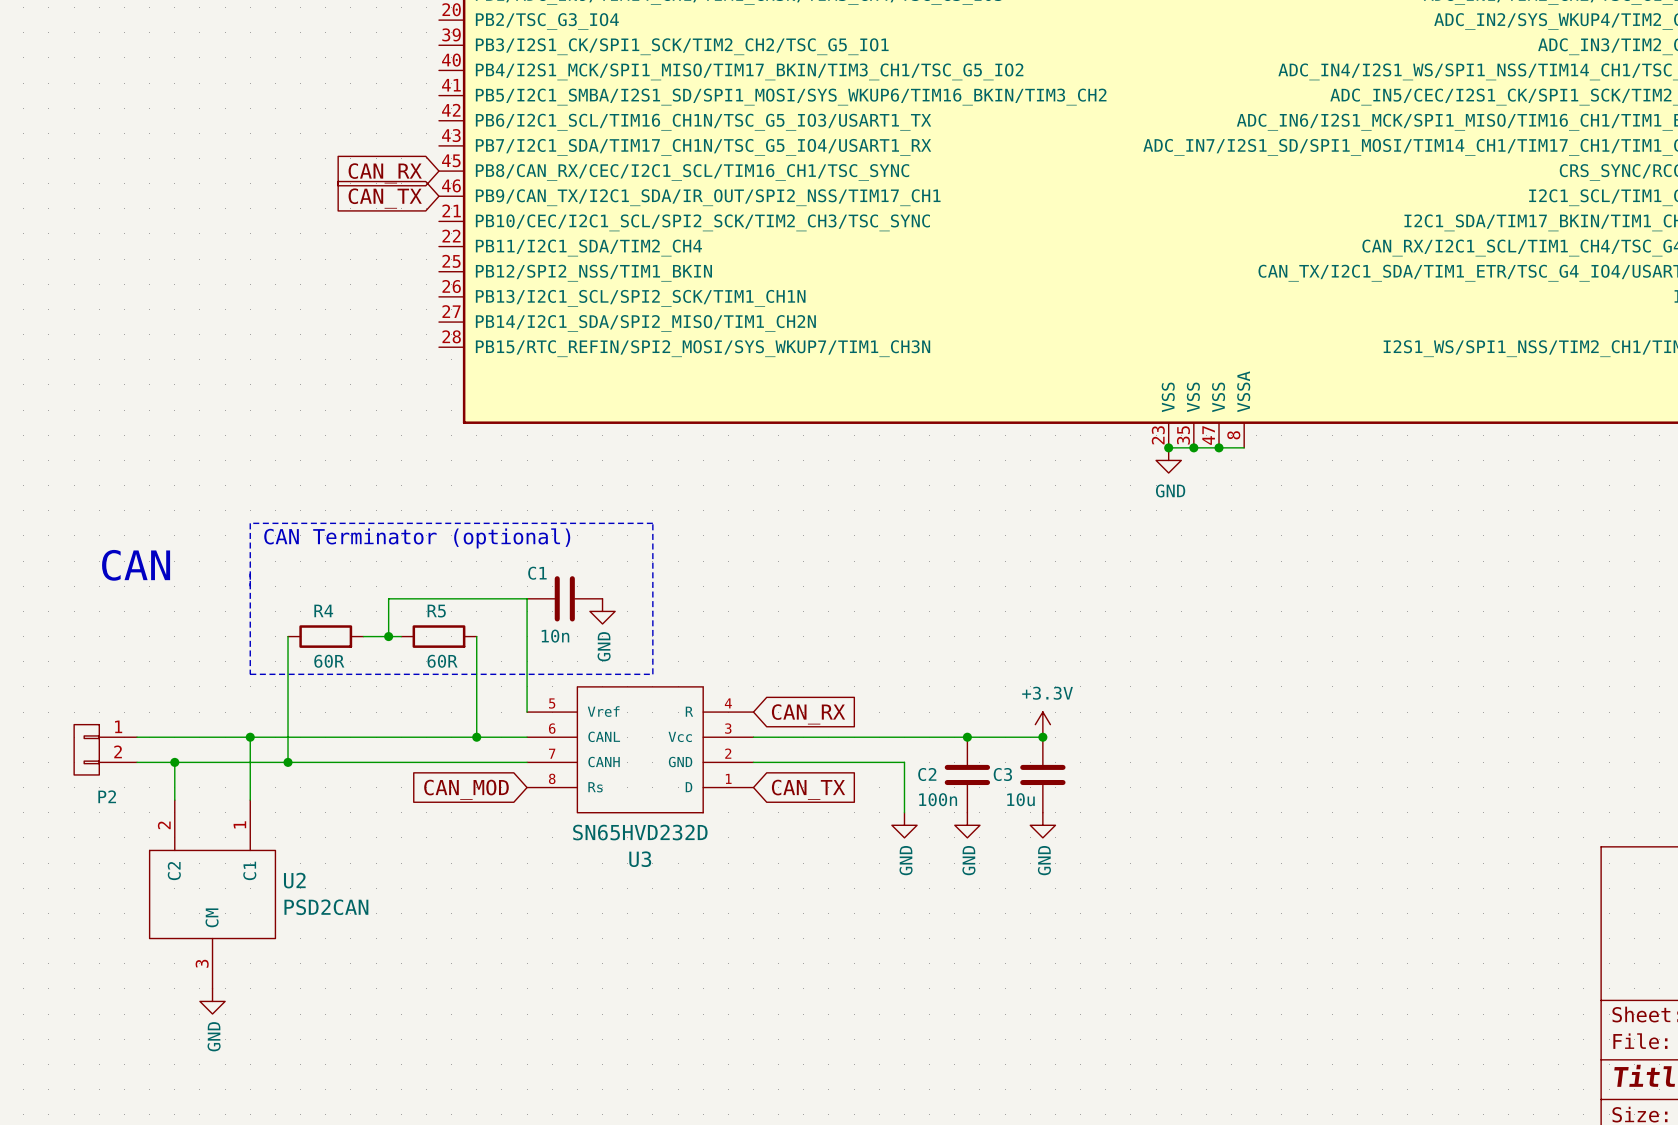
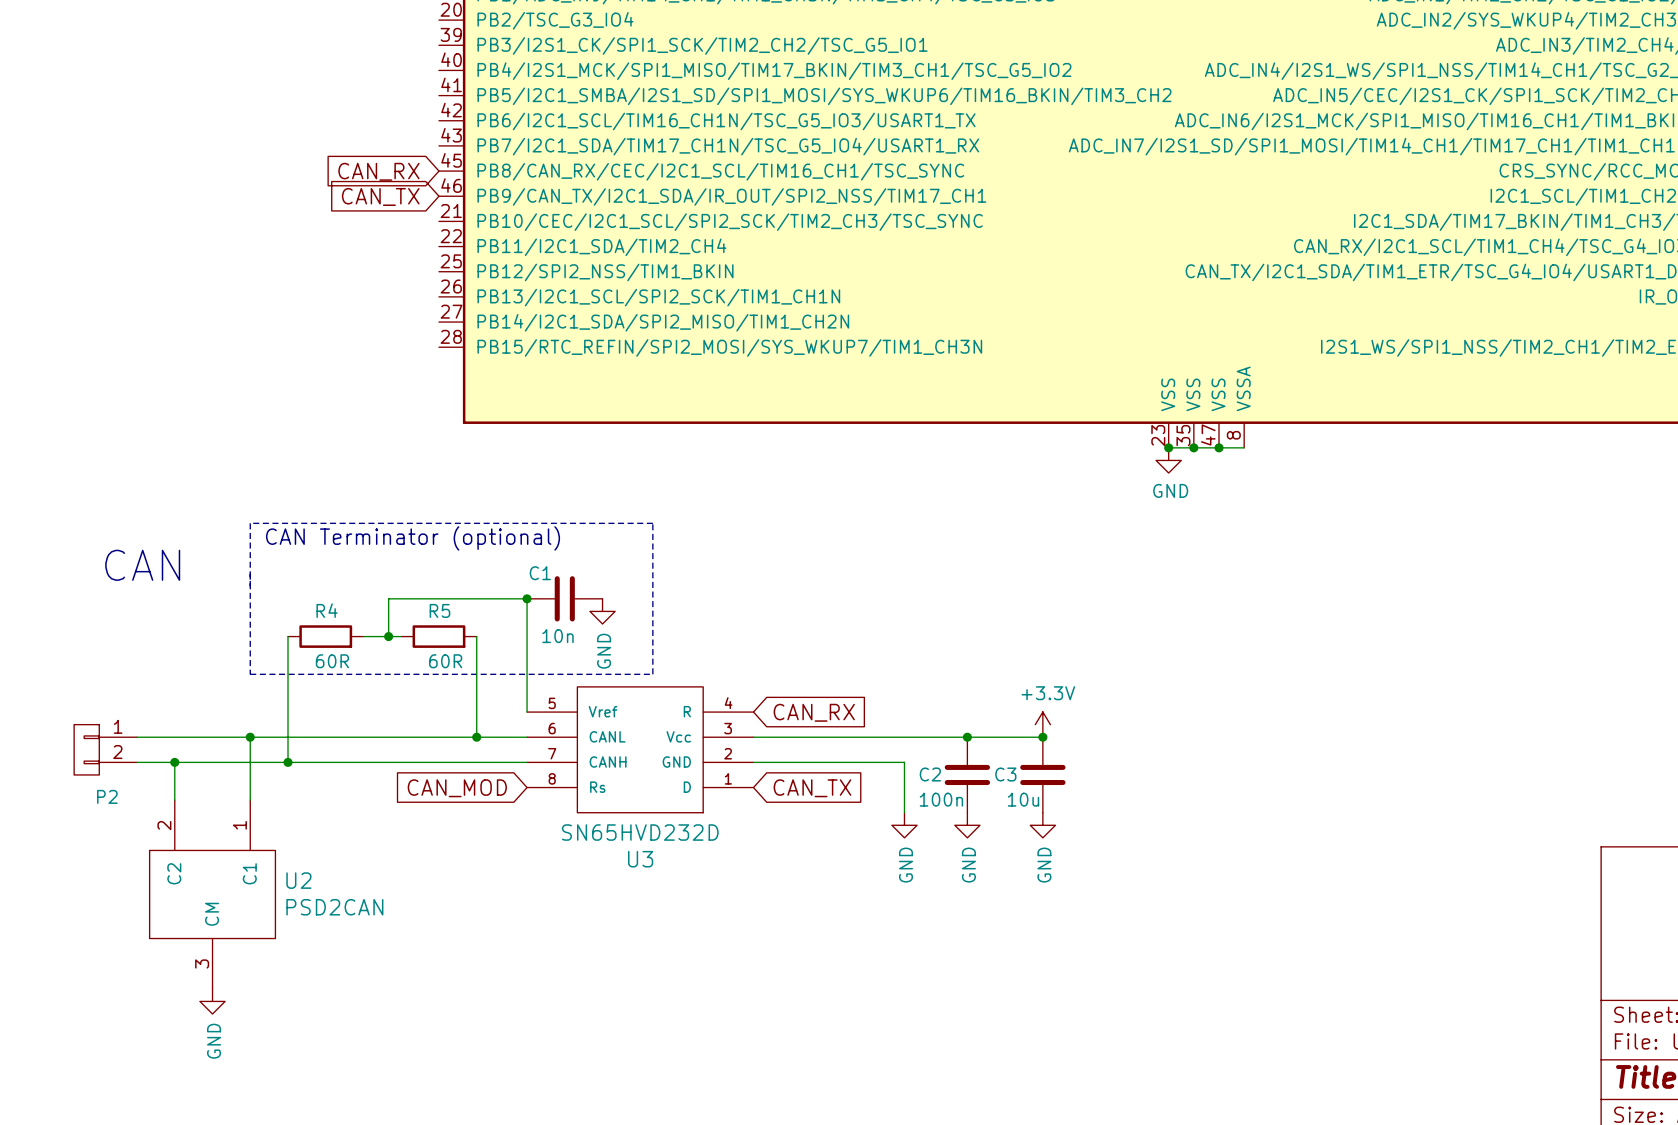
junction: none -> (527, 598)

